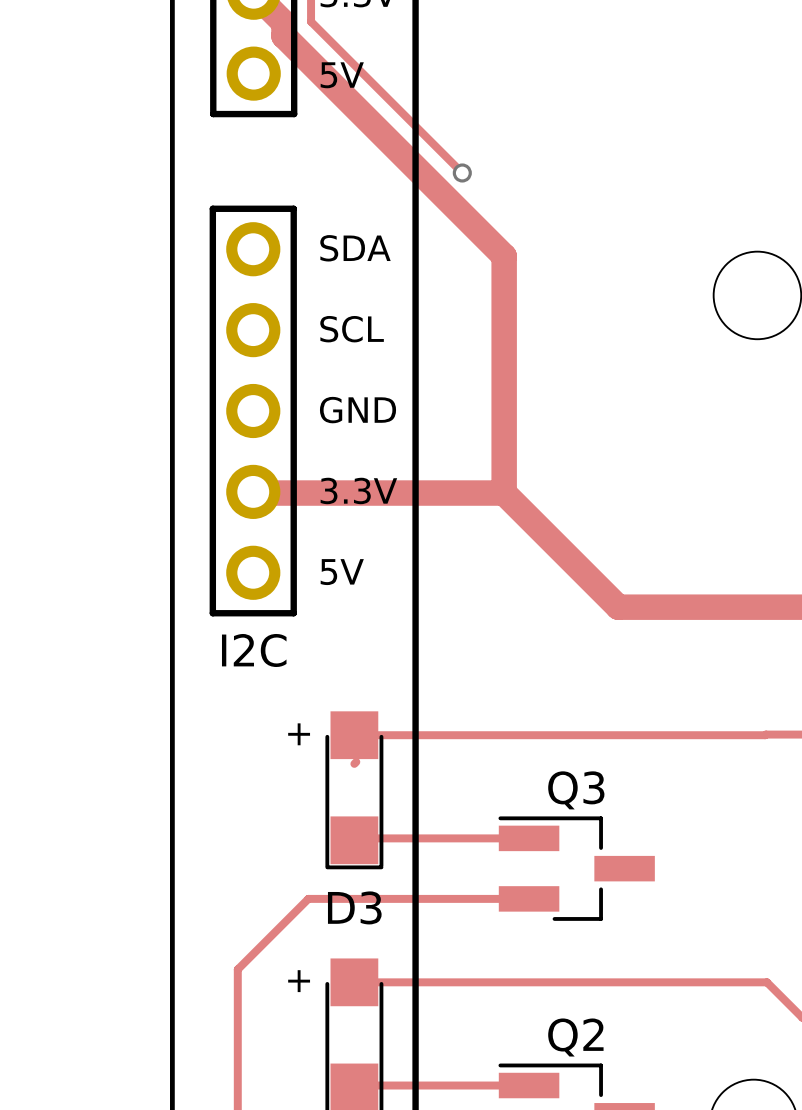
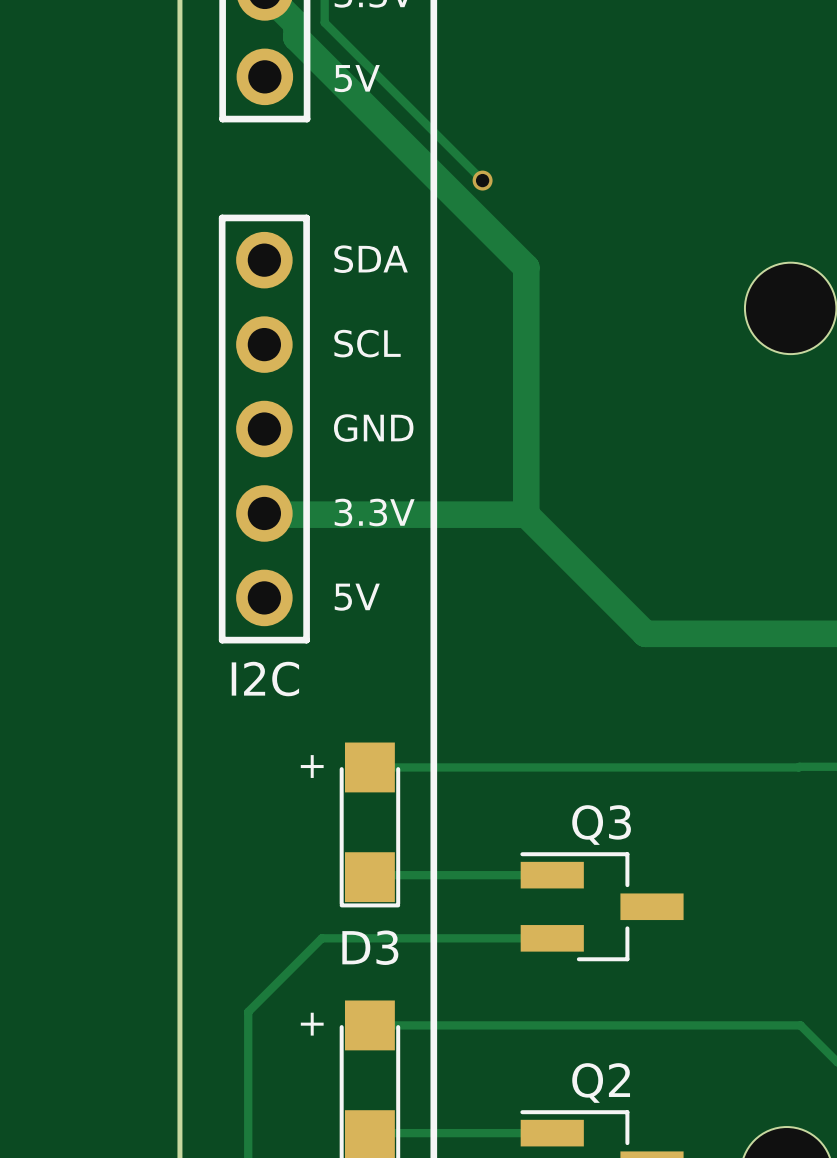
track: (356, 761) (354, 763) -> none

